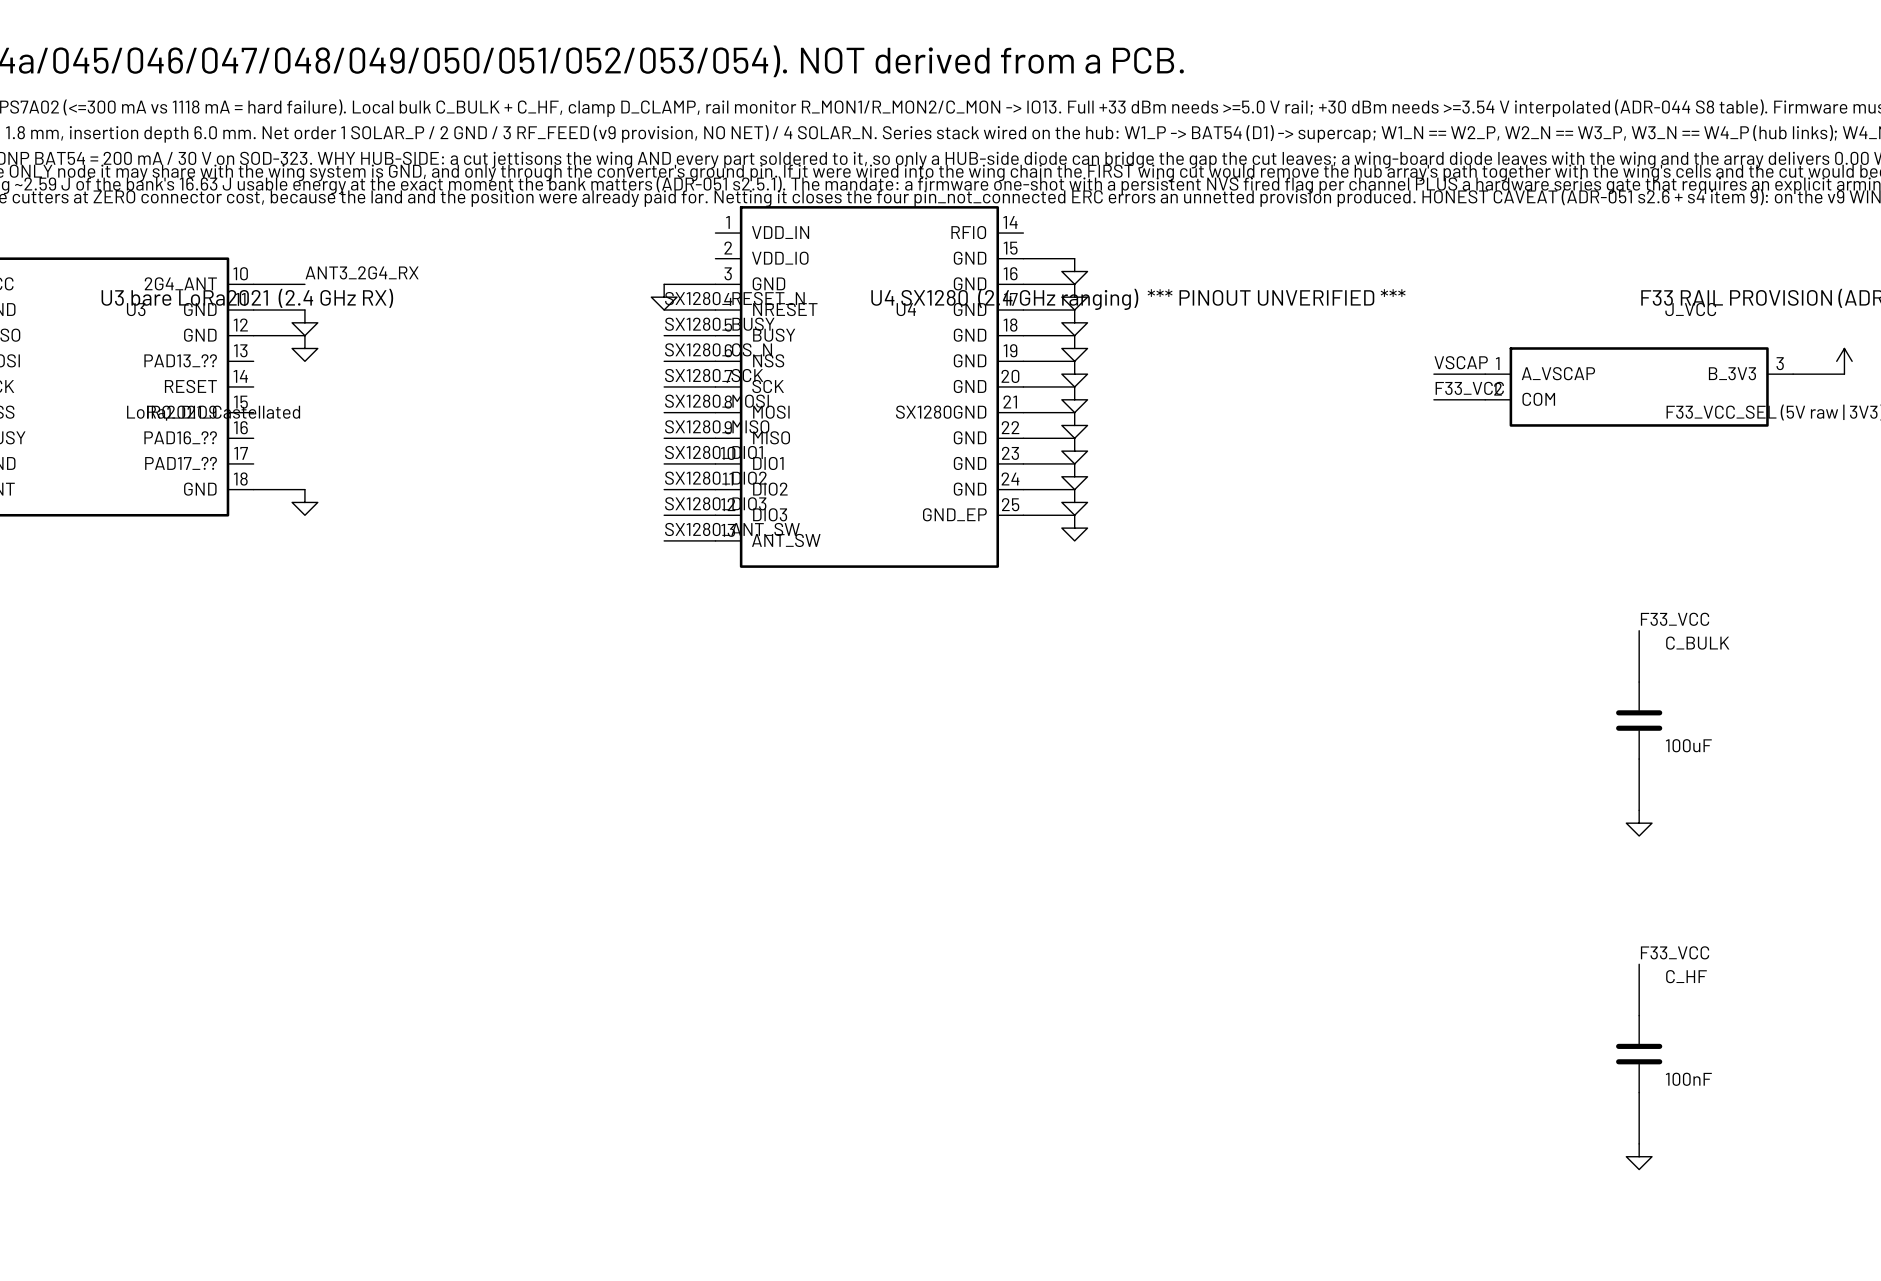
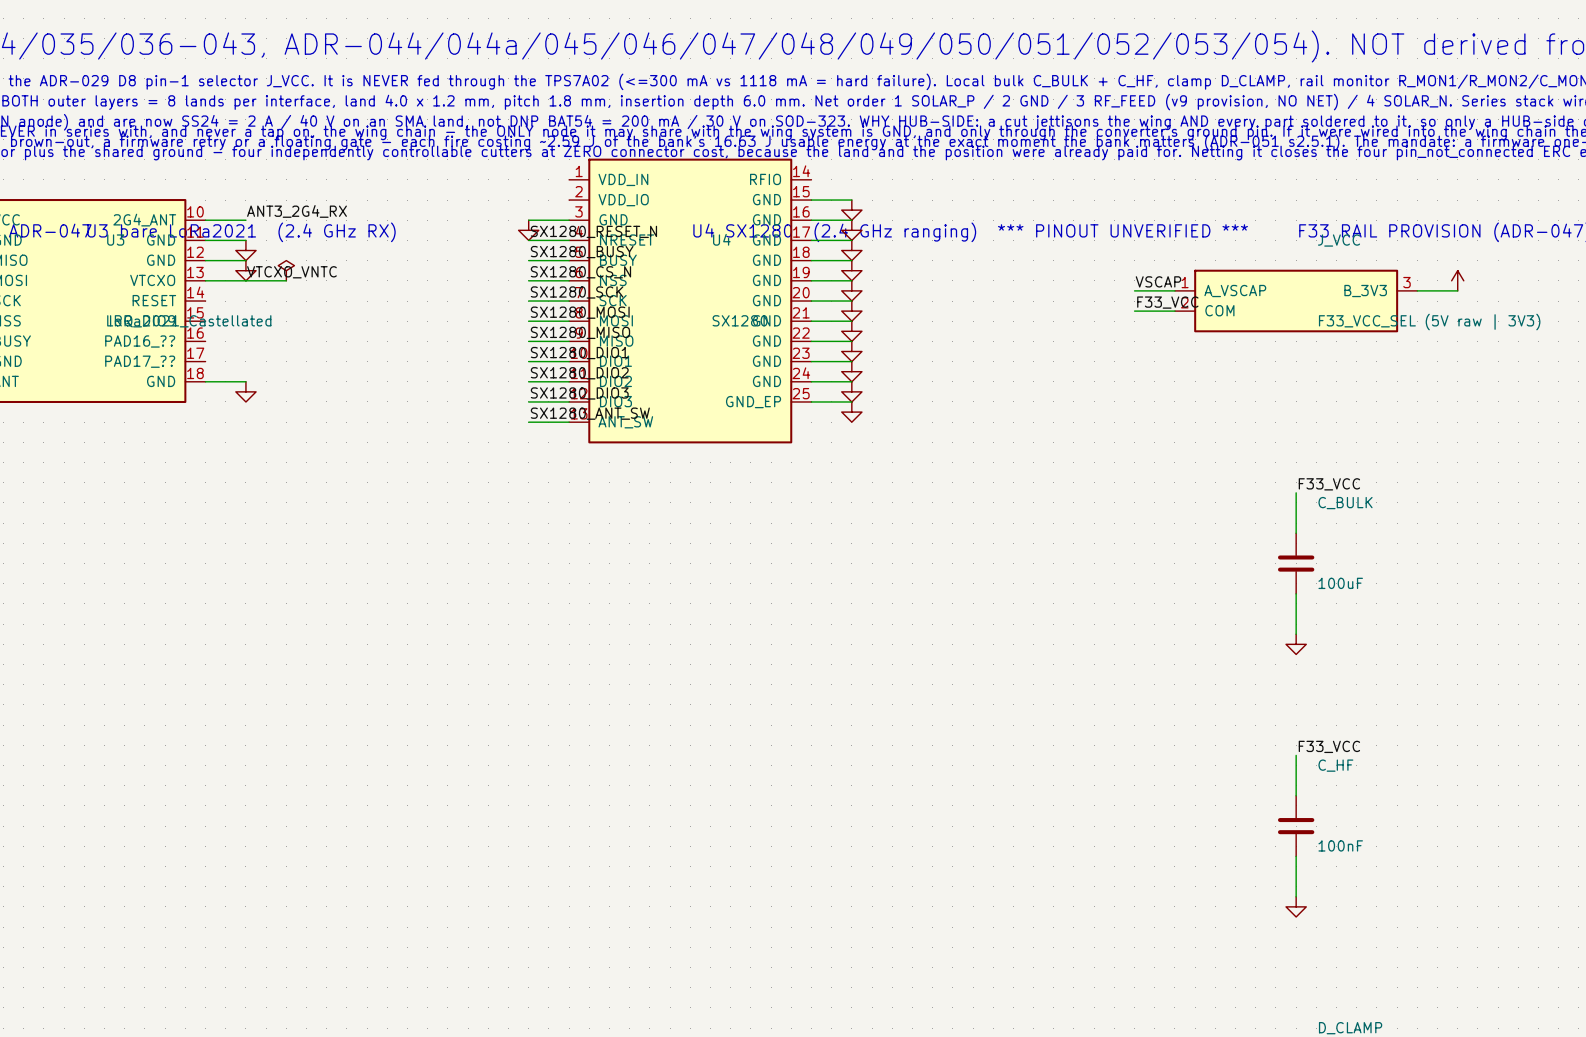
power symbol: none -> (286, 270)
label: none -> VTCXO_VNTC (291, 272)
U3 pin name: PAD13_?? (180, 360) -> VTCXO (152, 280)
wire: none -> (205, 280) (286, 280)

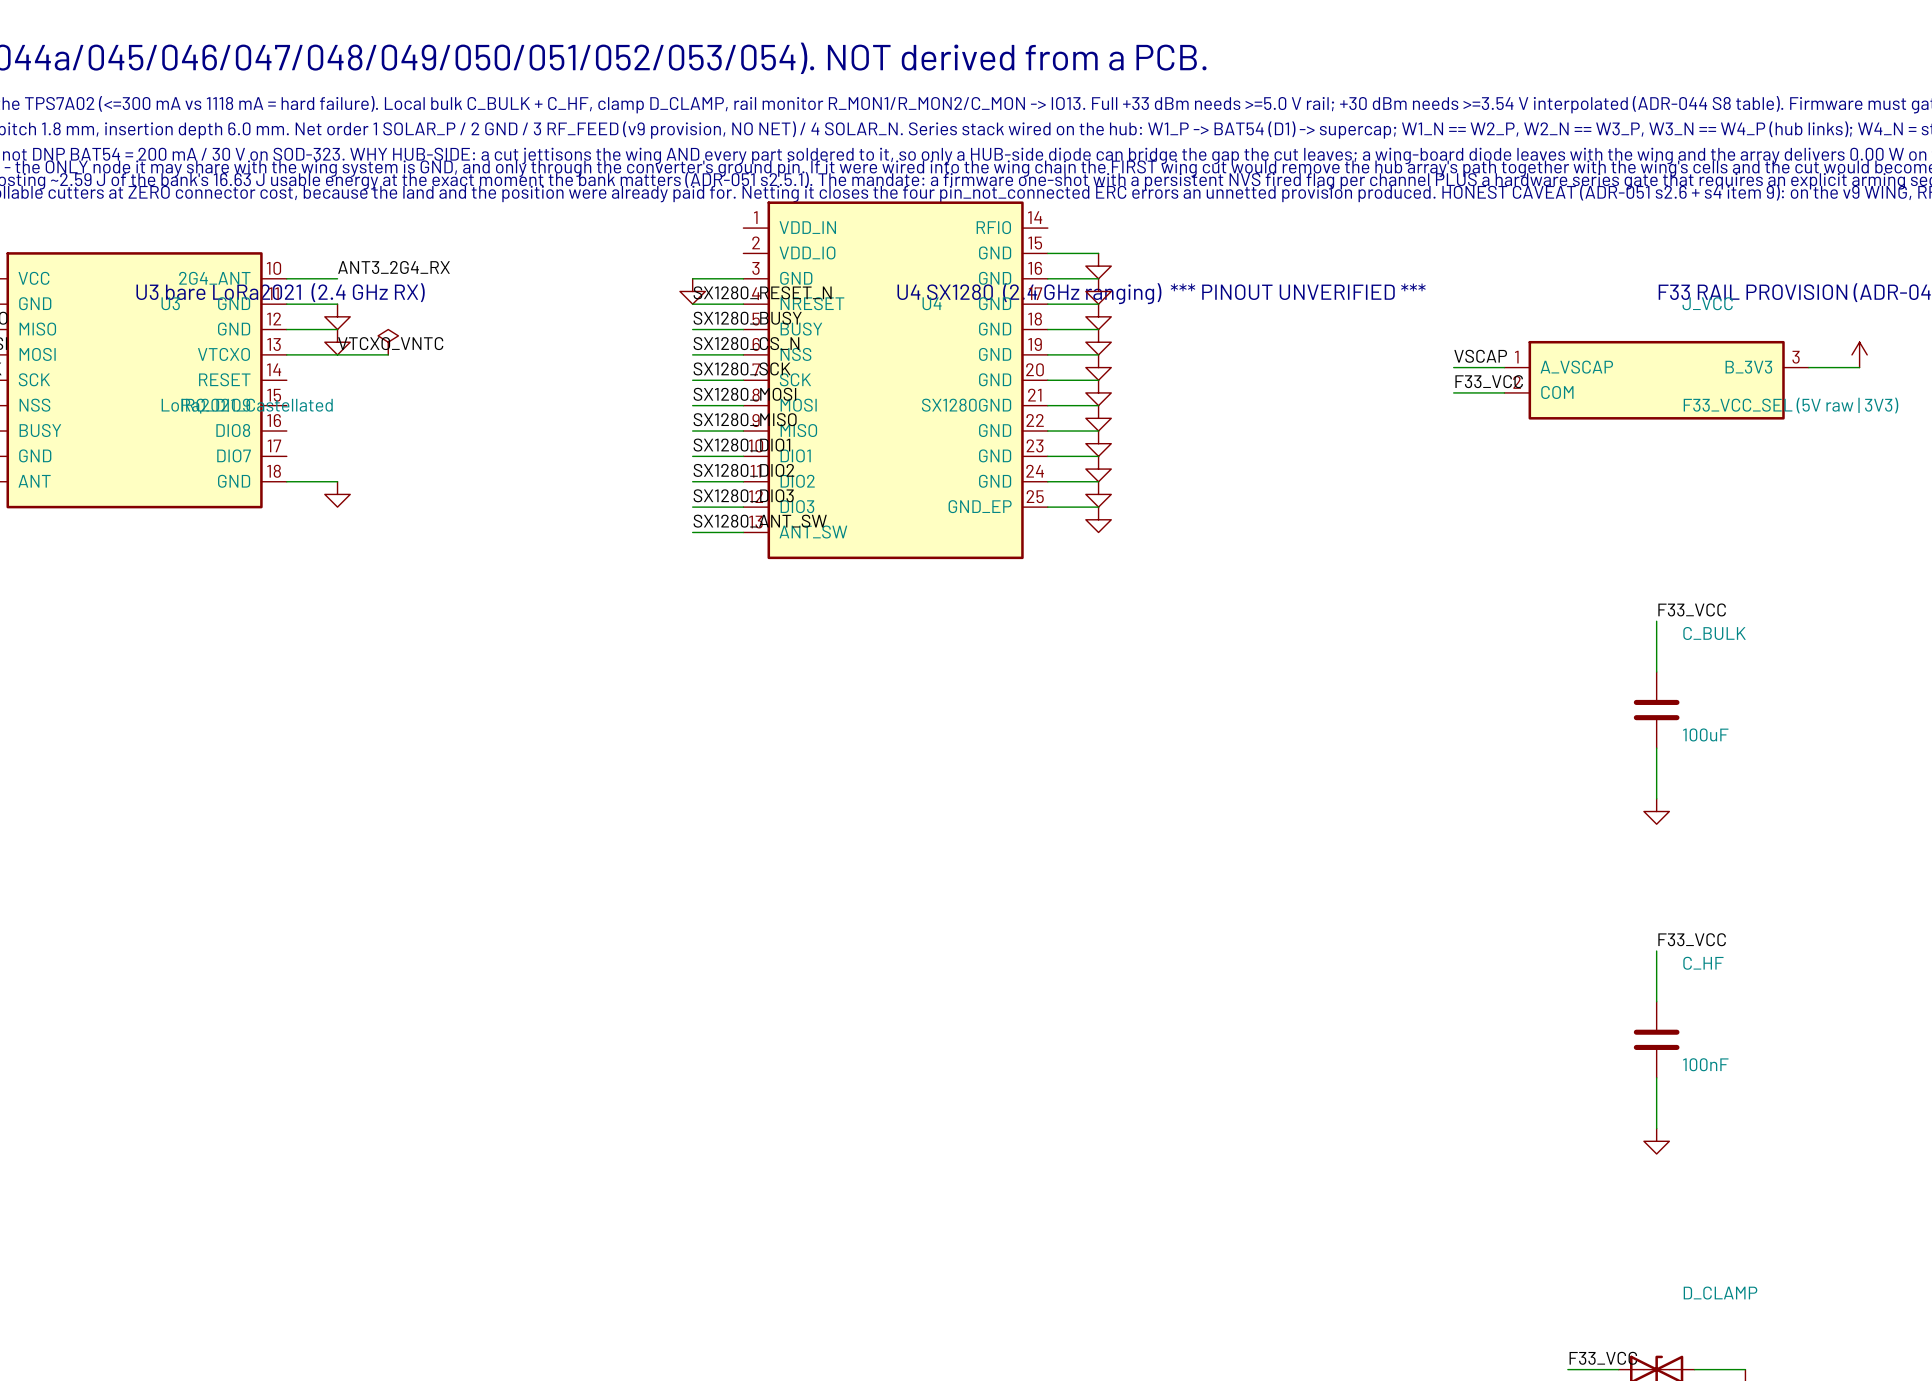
U3 pin name: PAD16_?? (140, 341) -> DIO8 (233, 430)
U3 pin name: PAD17_?? (140, 361) -> DIO7 (234, 455)

